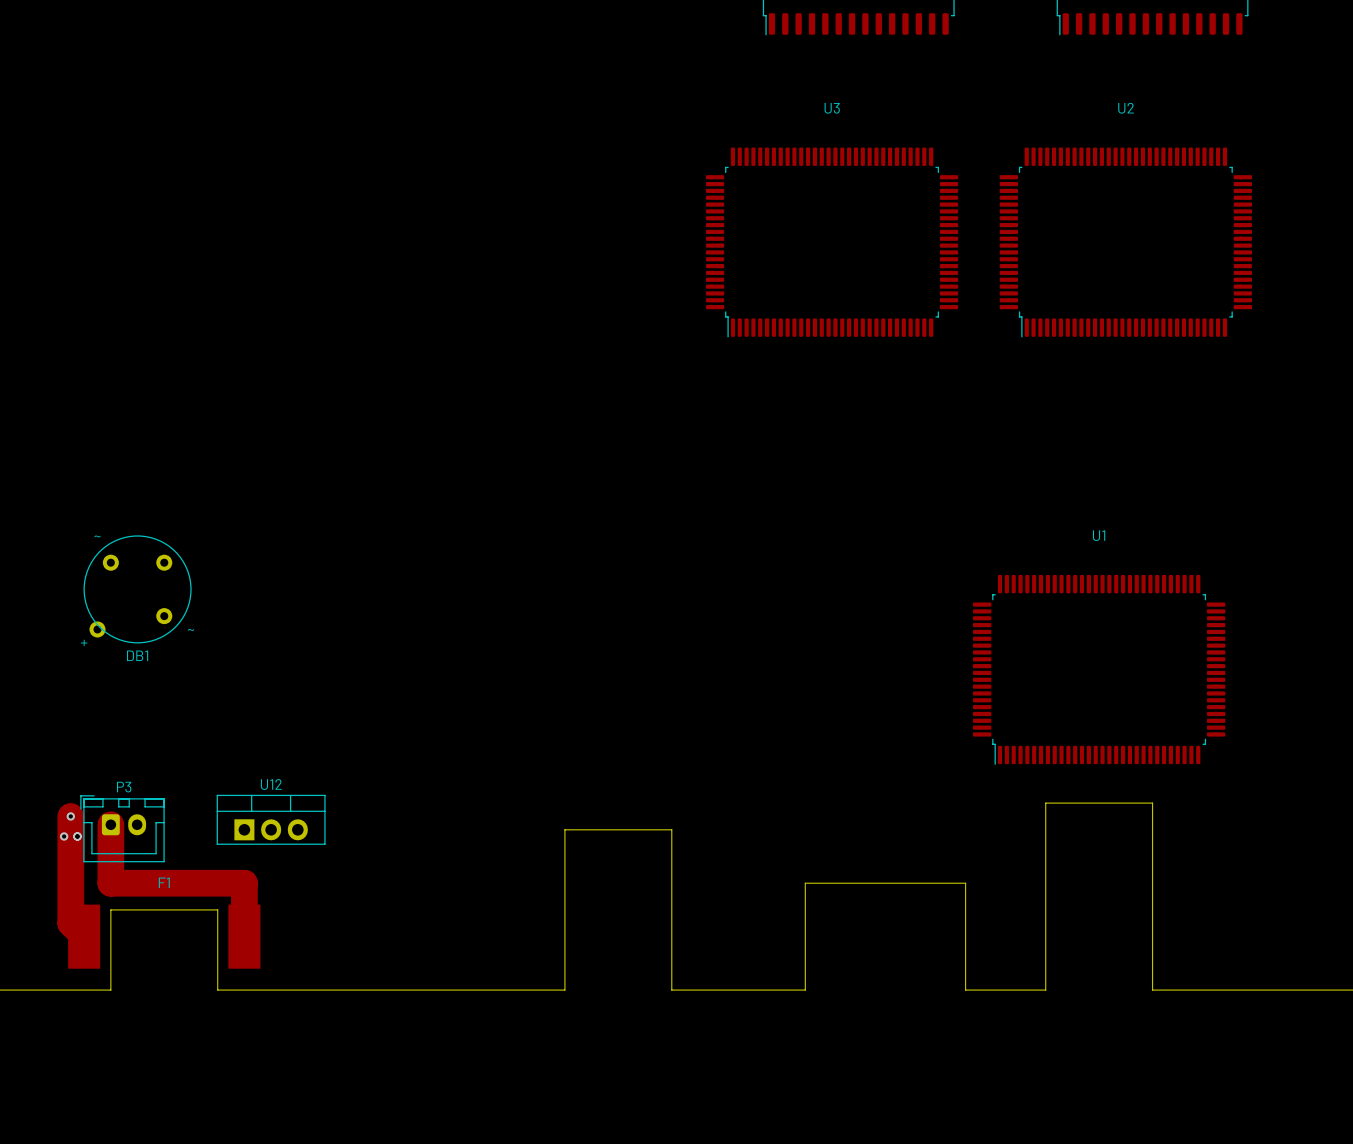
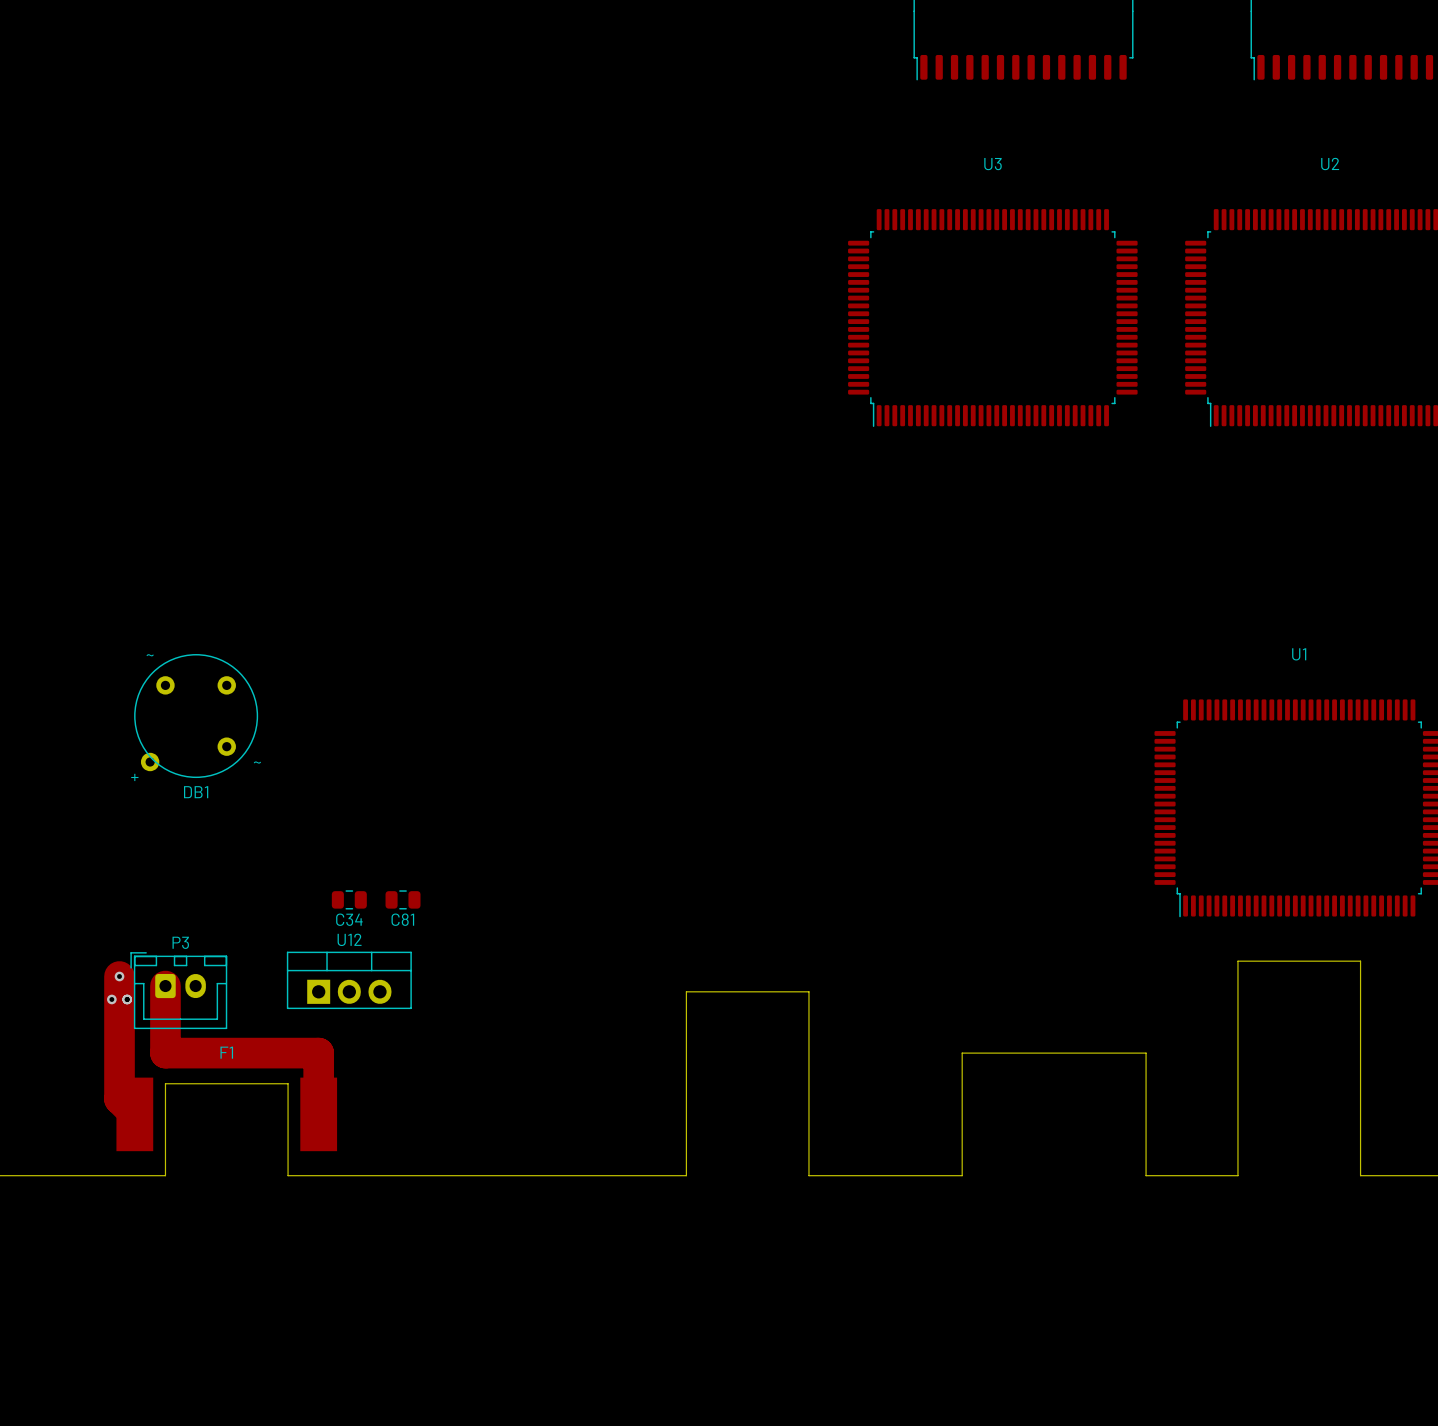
C34: none -> (349, 899)
C81: none -> (403, 899)

